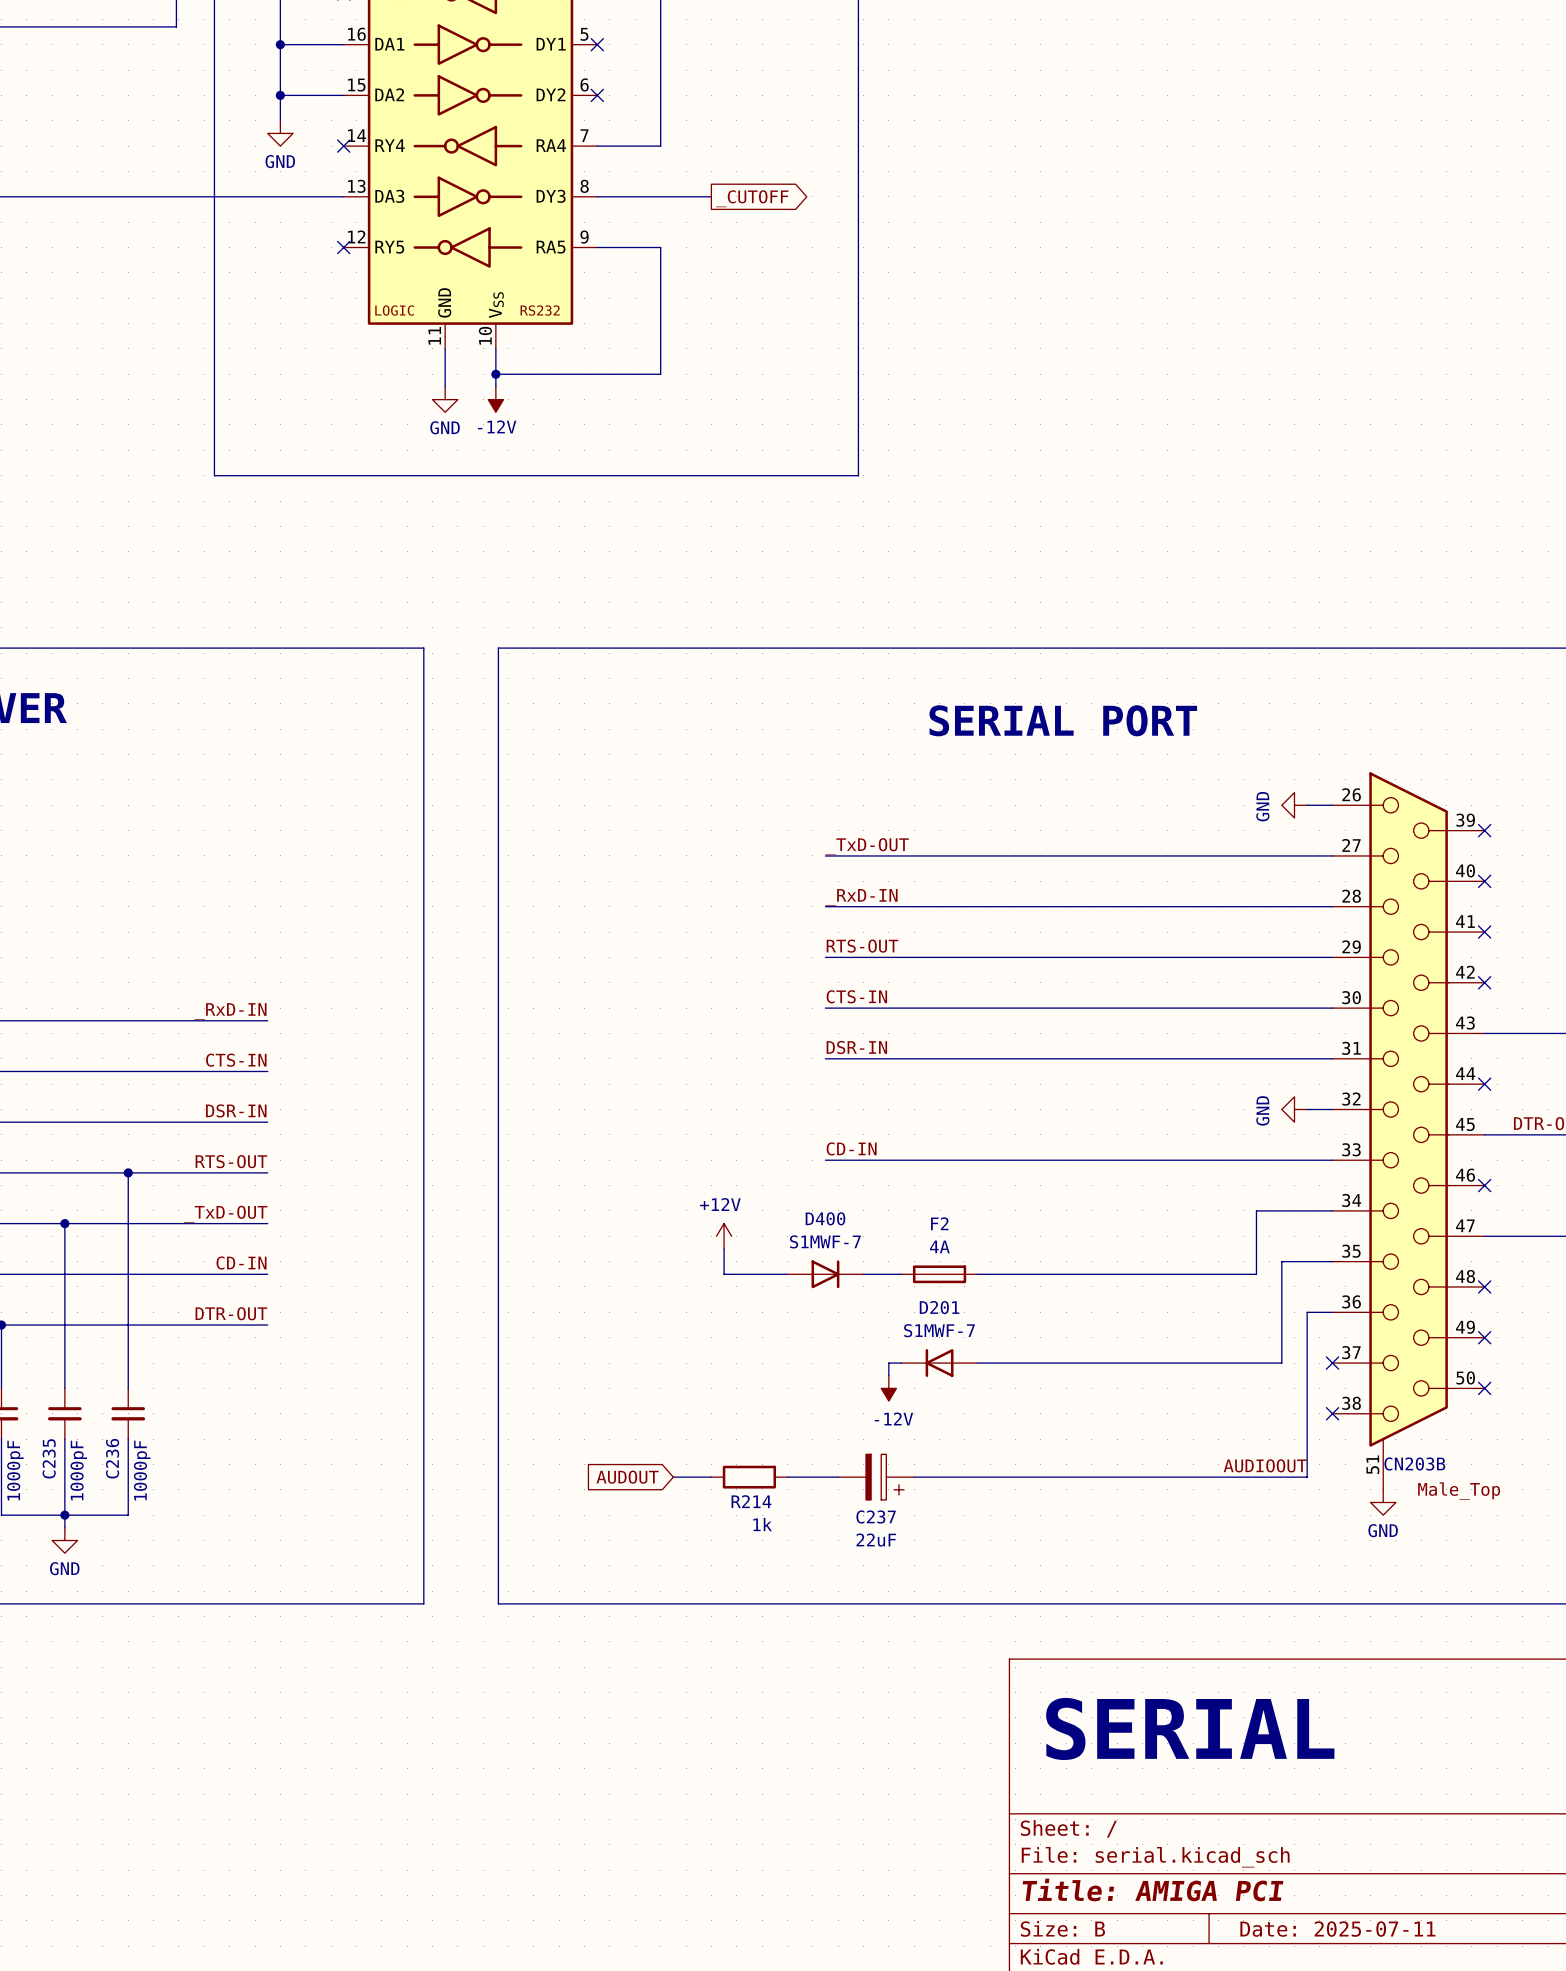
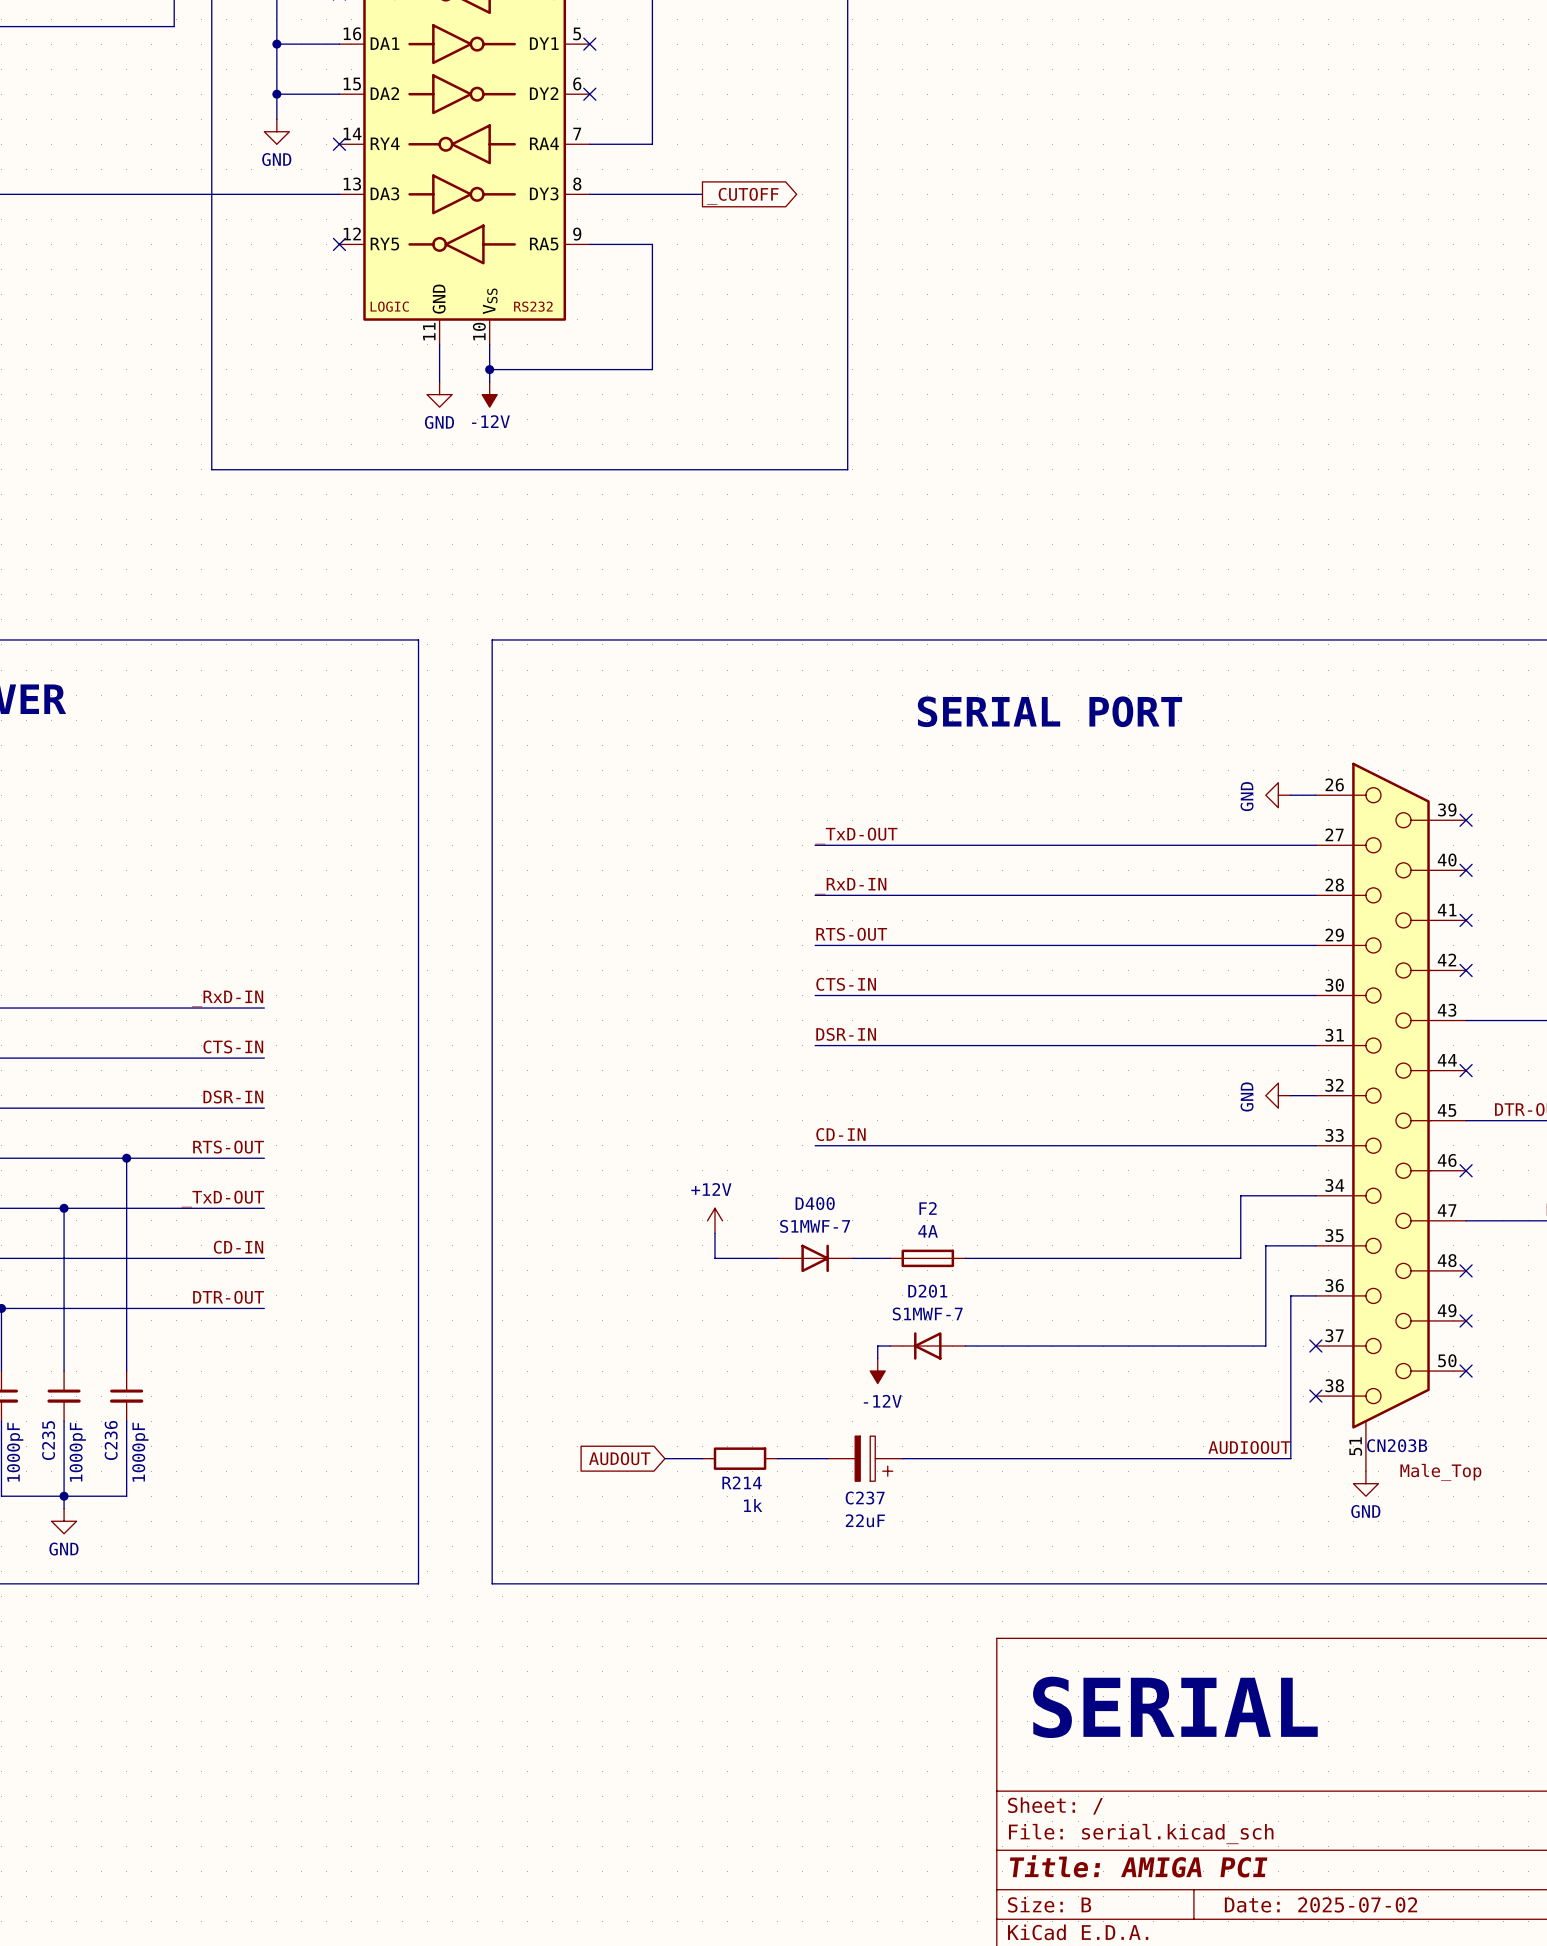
title block: Date: 2025-07-11 (1337, 1929) -> Date: 2025-07-02 (1321, 1904)

